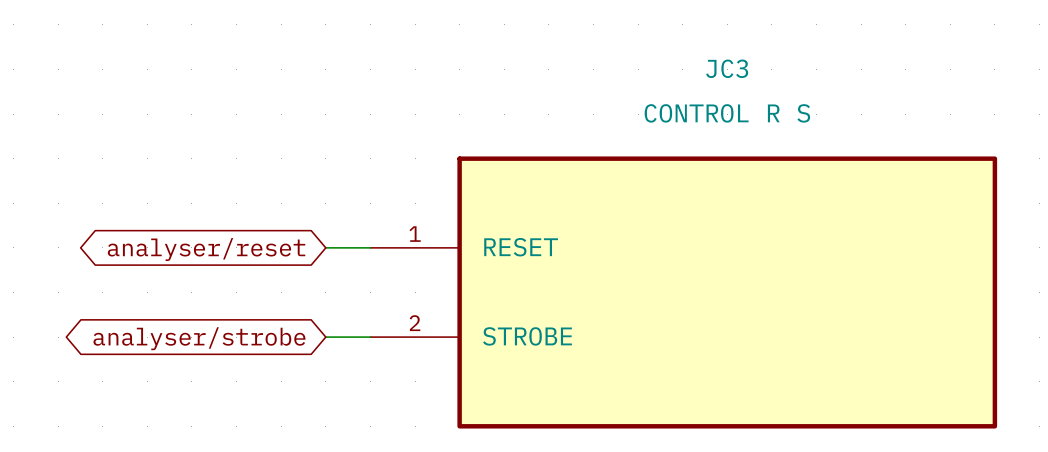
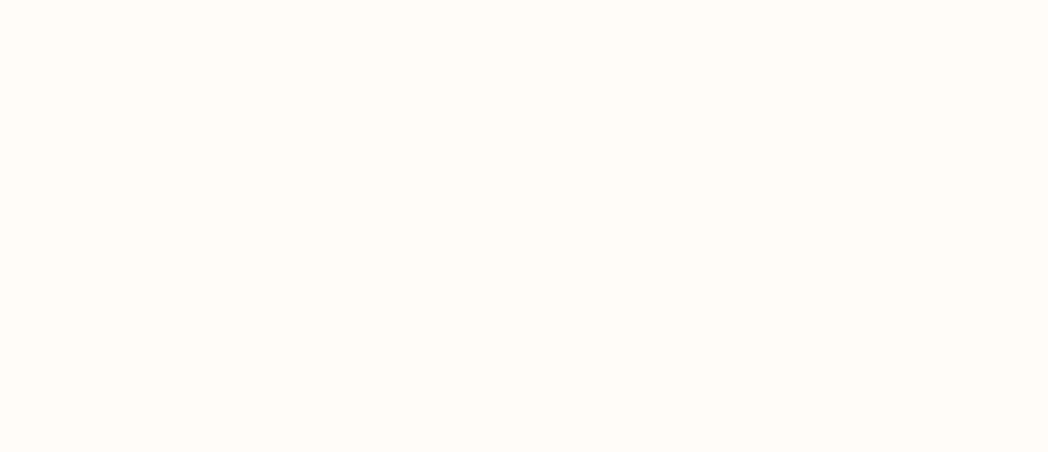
wire: (325, 247) (370, 247) -> none
global label: analyser/reset (206, 249) -> none
JC3: CONTROL R S (683, 292) -> none
wire: (325, 337) (370, 337) -> none
global label: analyser/strobe (199, 338) -> none

